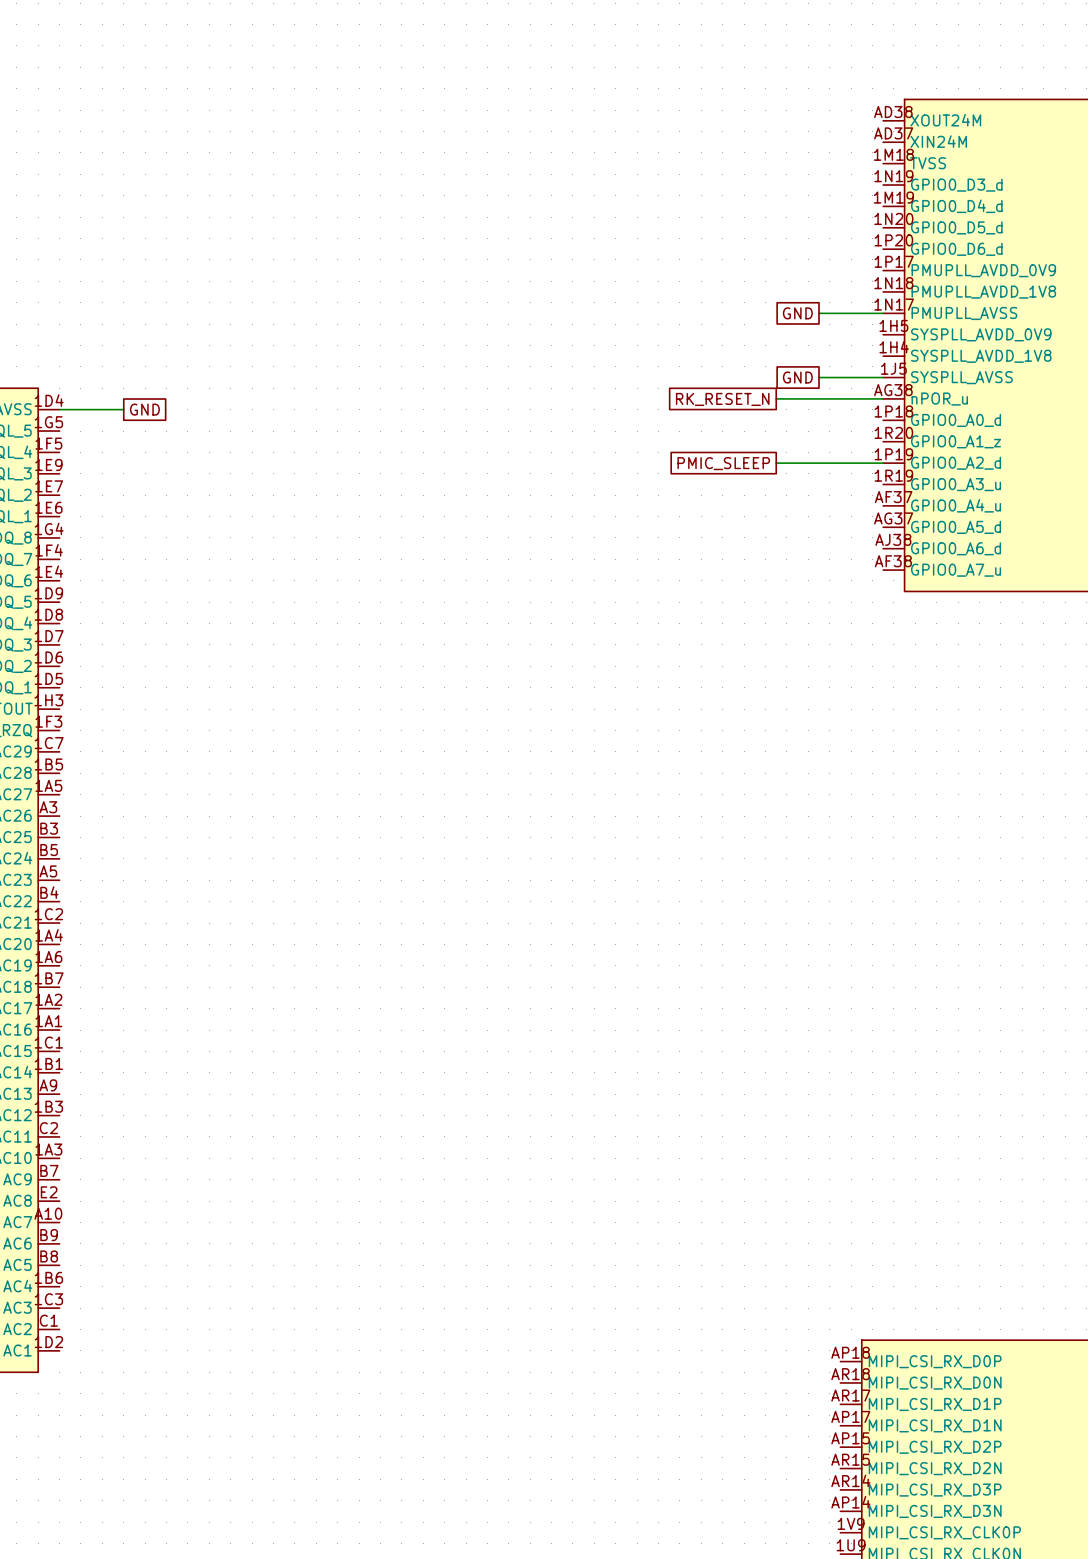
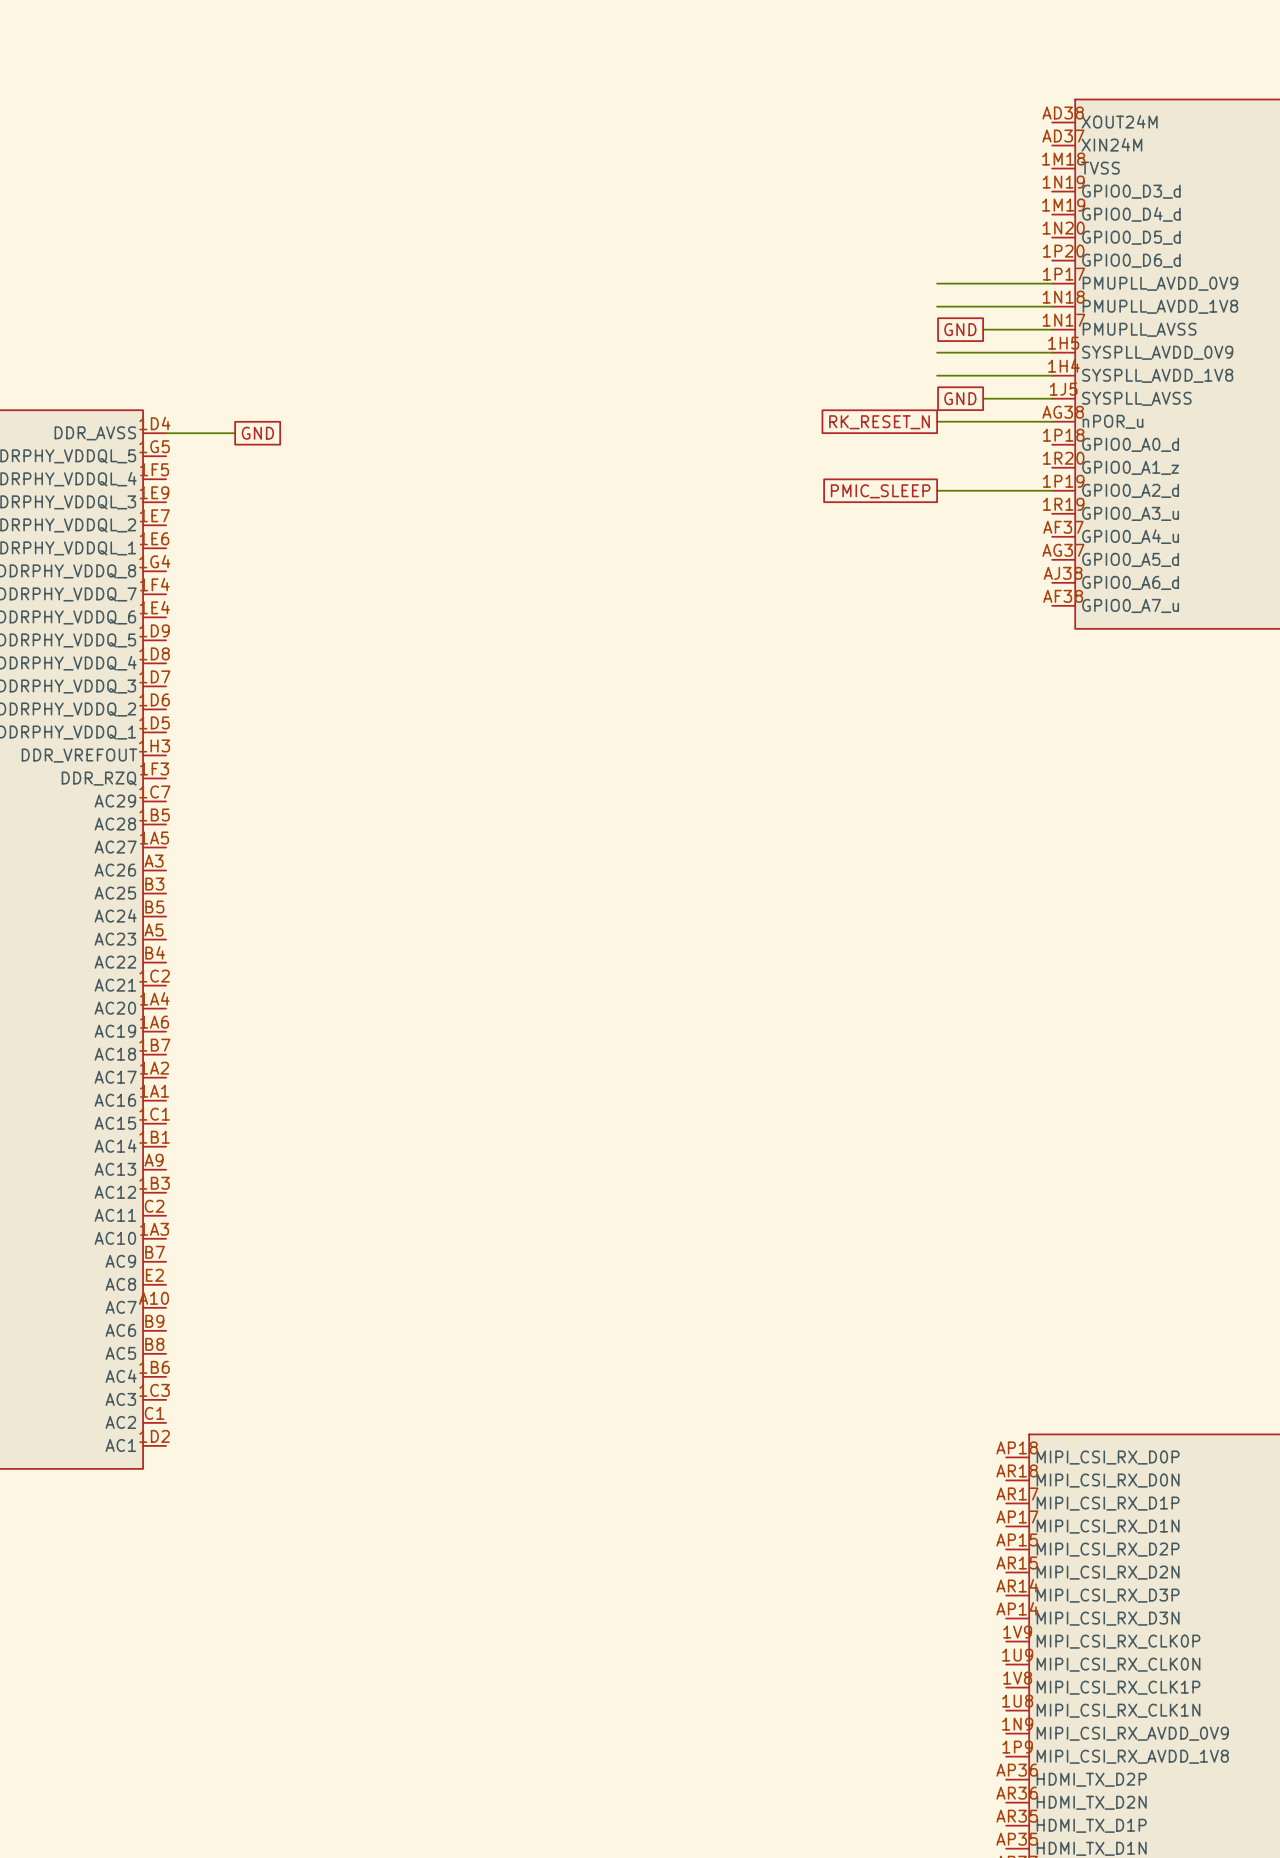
wire: none -> (937, 283) (1052, 283)
wire: none -> (937, 306) (1052, 306)
wire: none -> (937, 352) (1052, 352)
wire: none -> (937, 375) (1052, 375)

